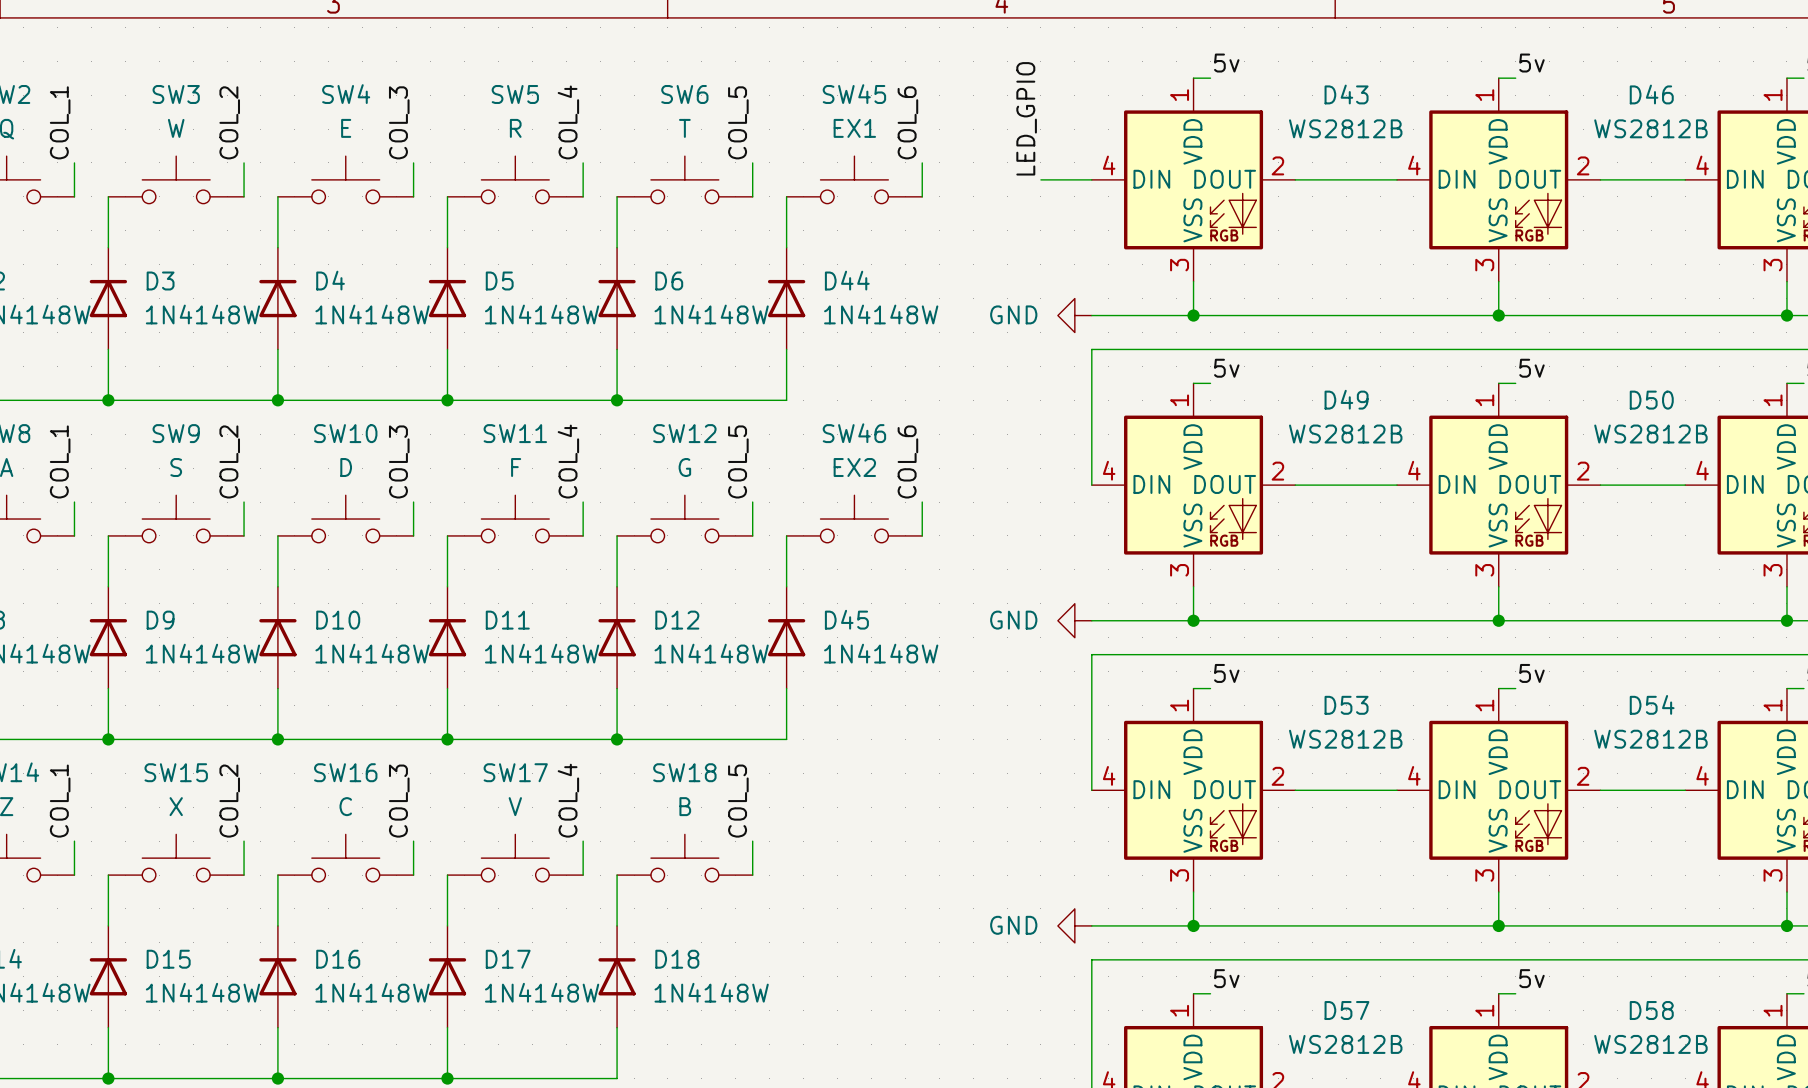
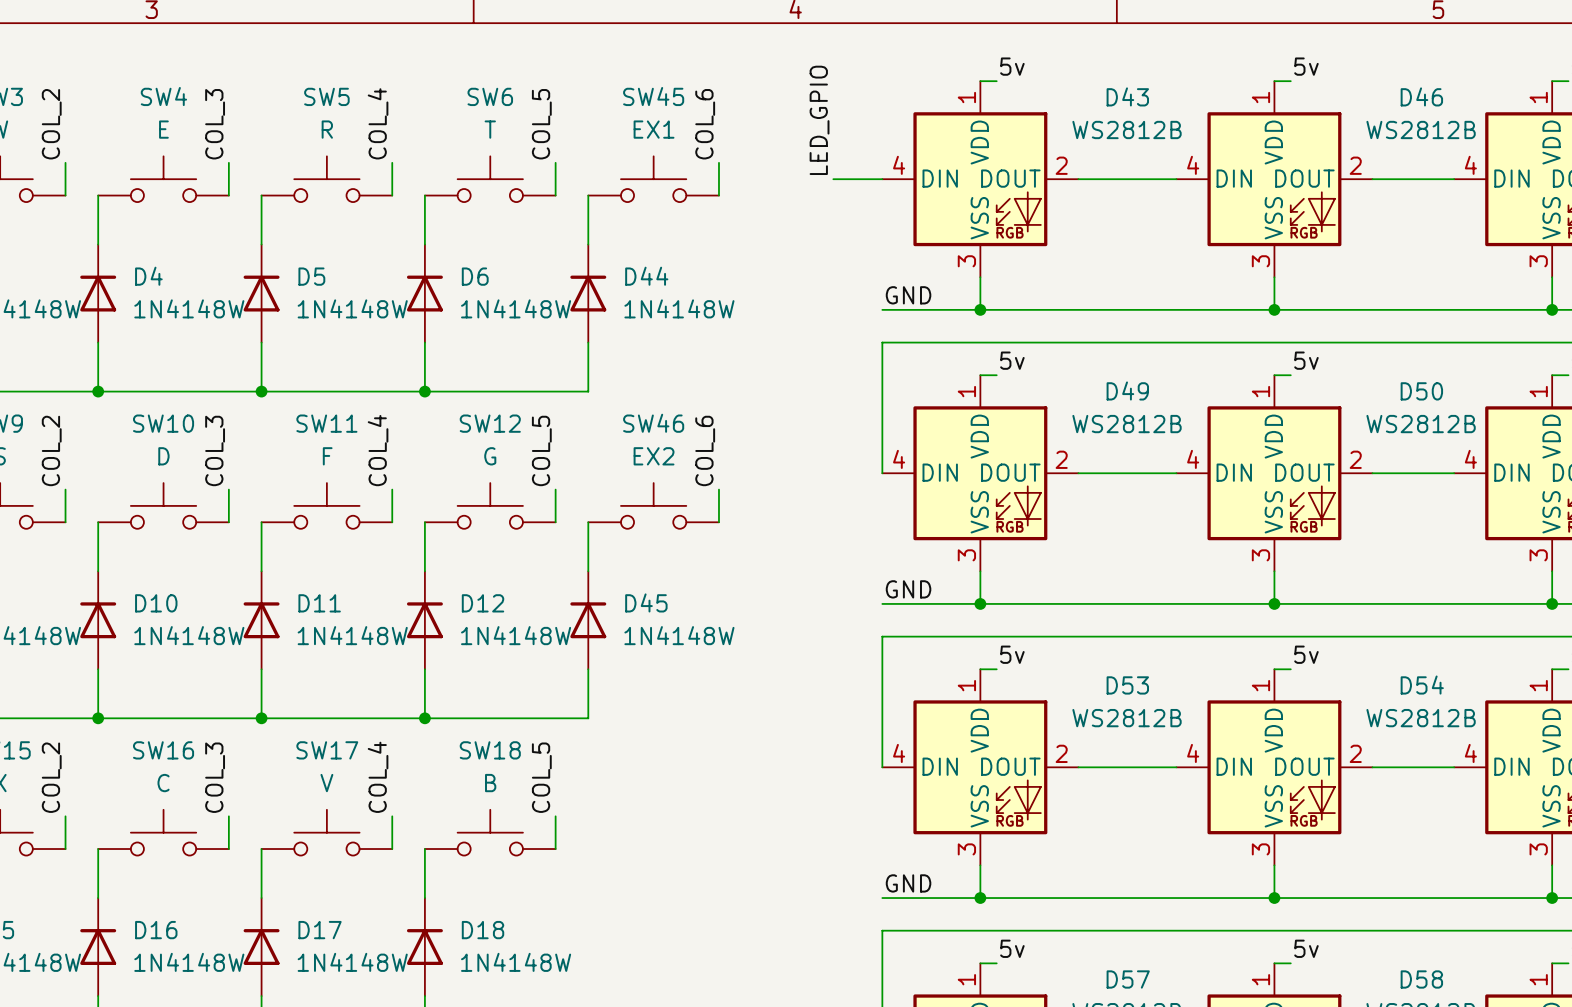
label: none -> GND (908, 295)
power symbol: GND (1074, 315) -> none
label: none -> GND (908, 589)
power symbol: GND (1074, 620) -> none
label: none -> GND (908, 883)
power symbol: GND (1074, 925) -> none

